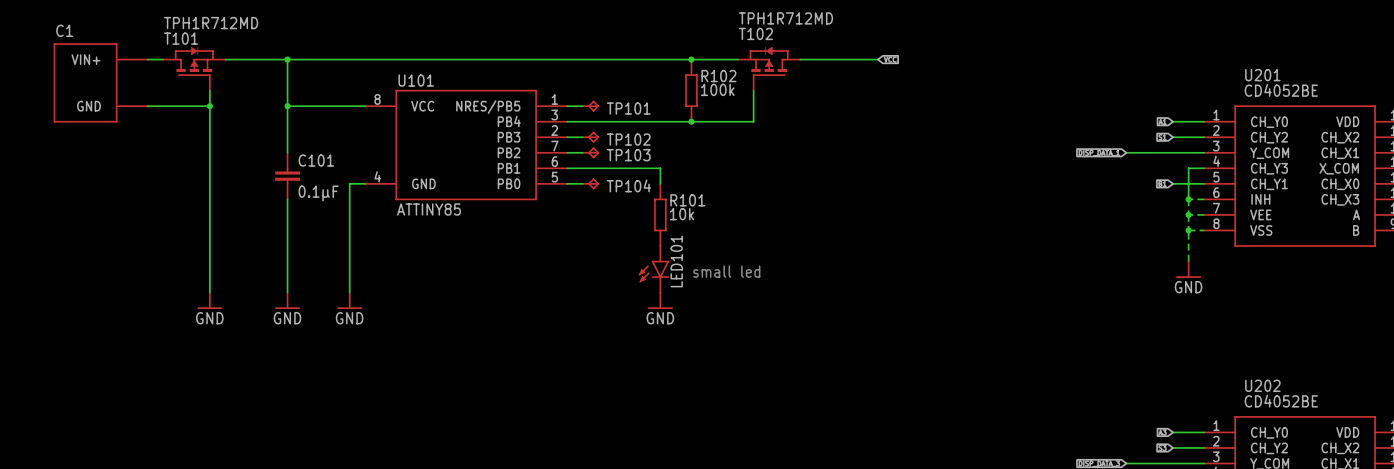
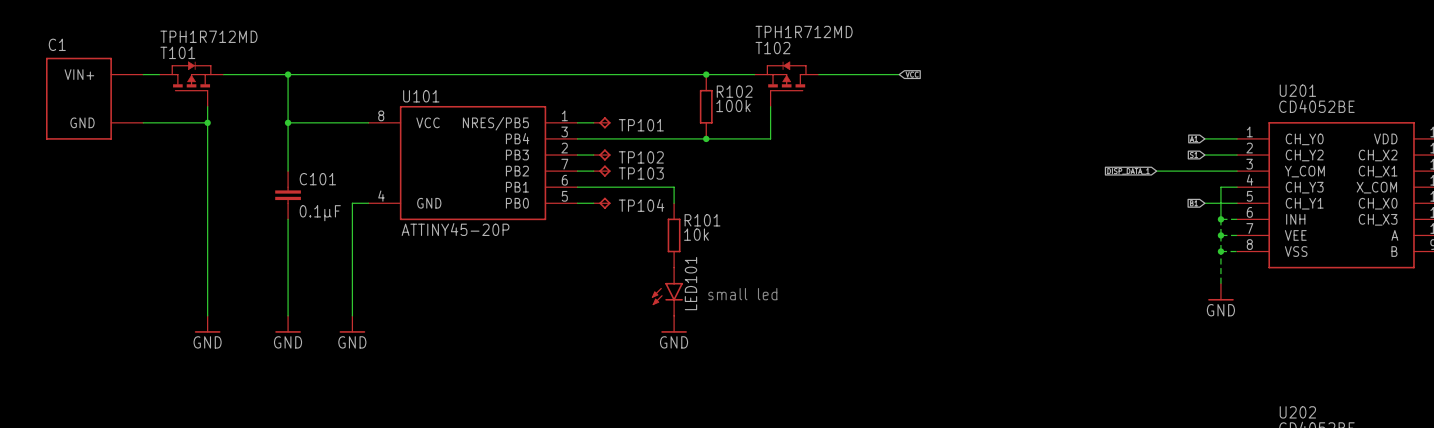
U101 value: ATTINY85 (429, 209) -> ATTINY45-20P (455, 229)

